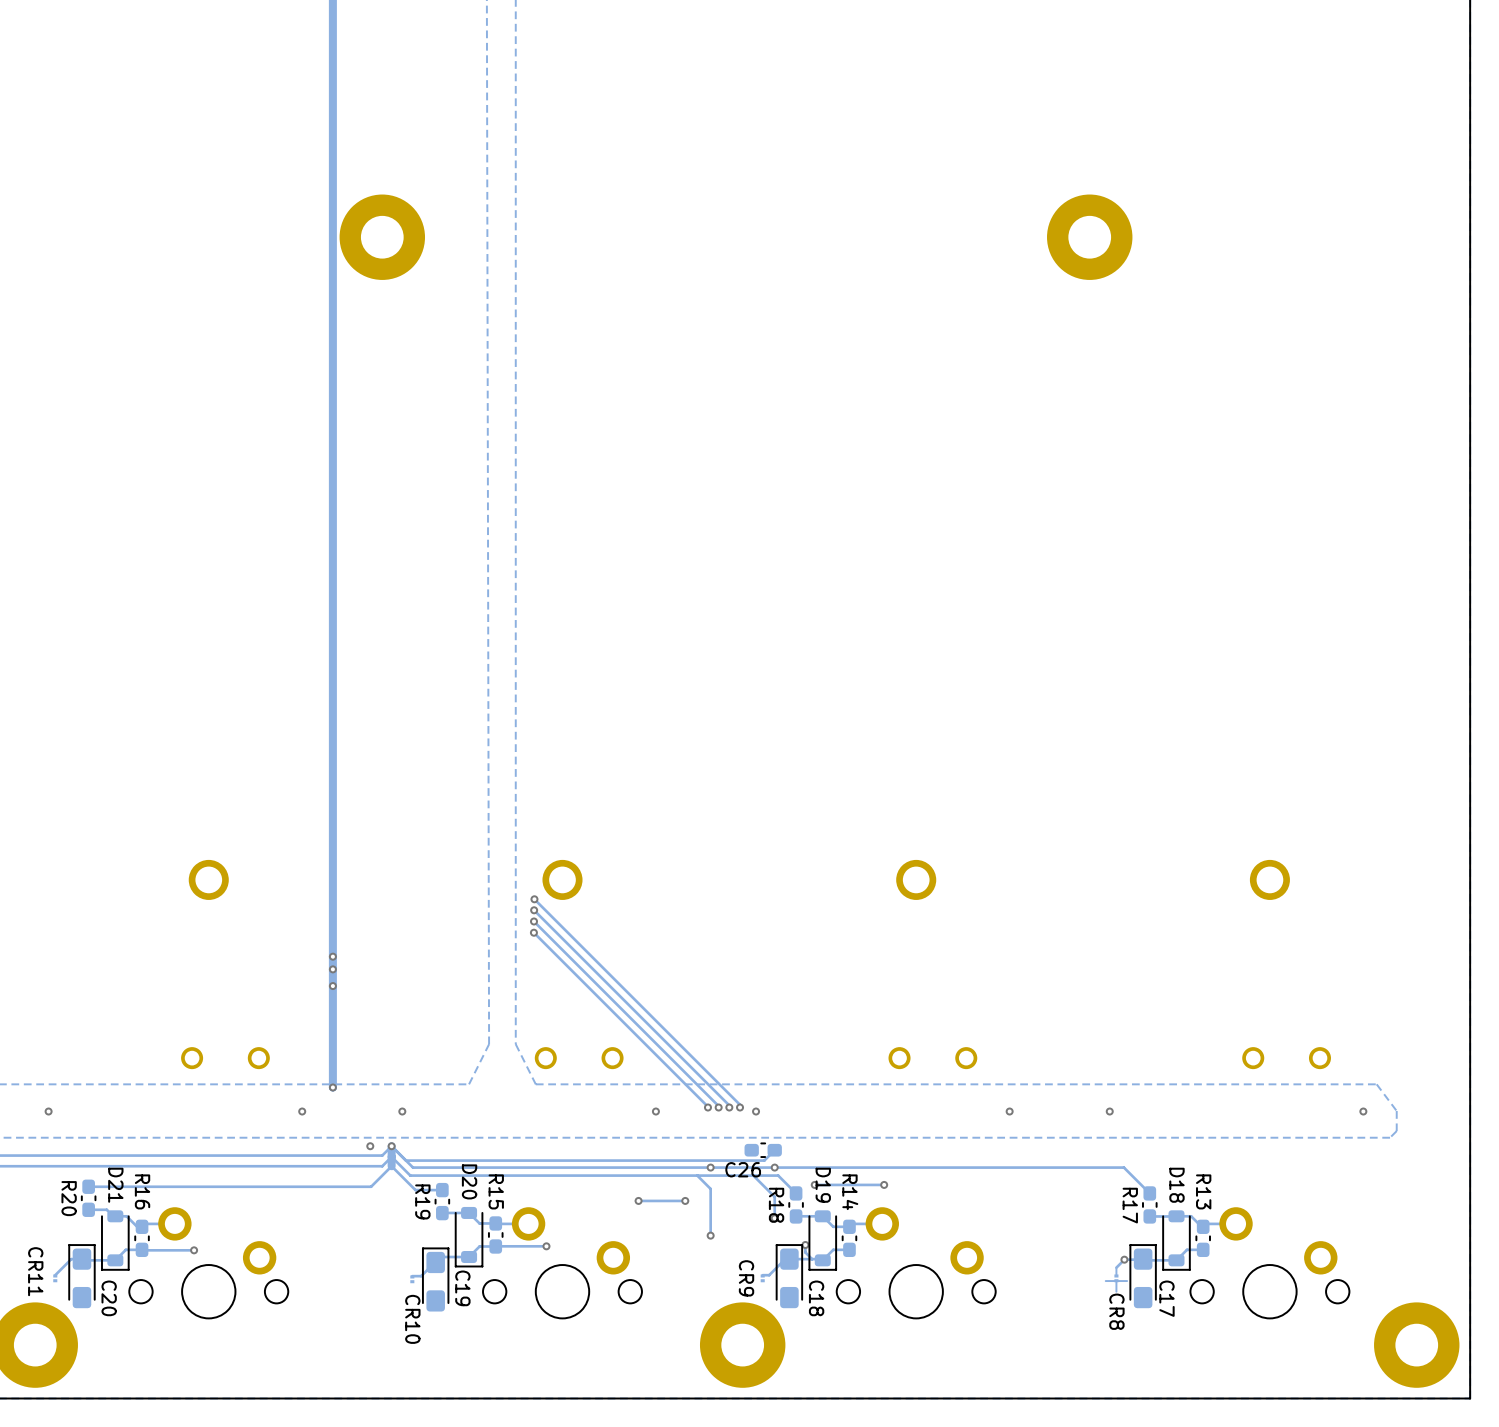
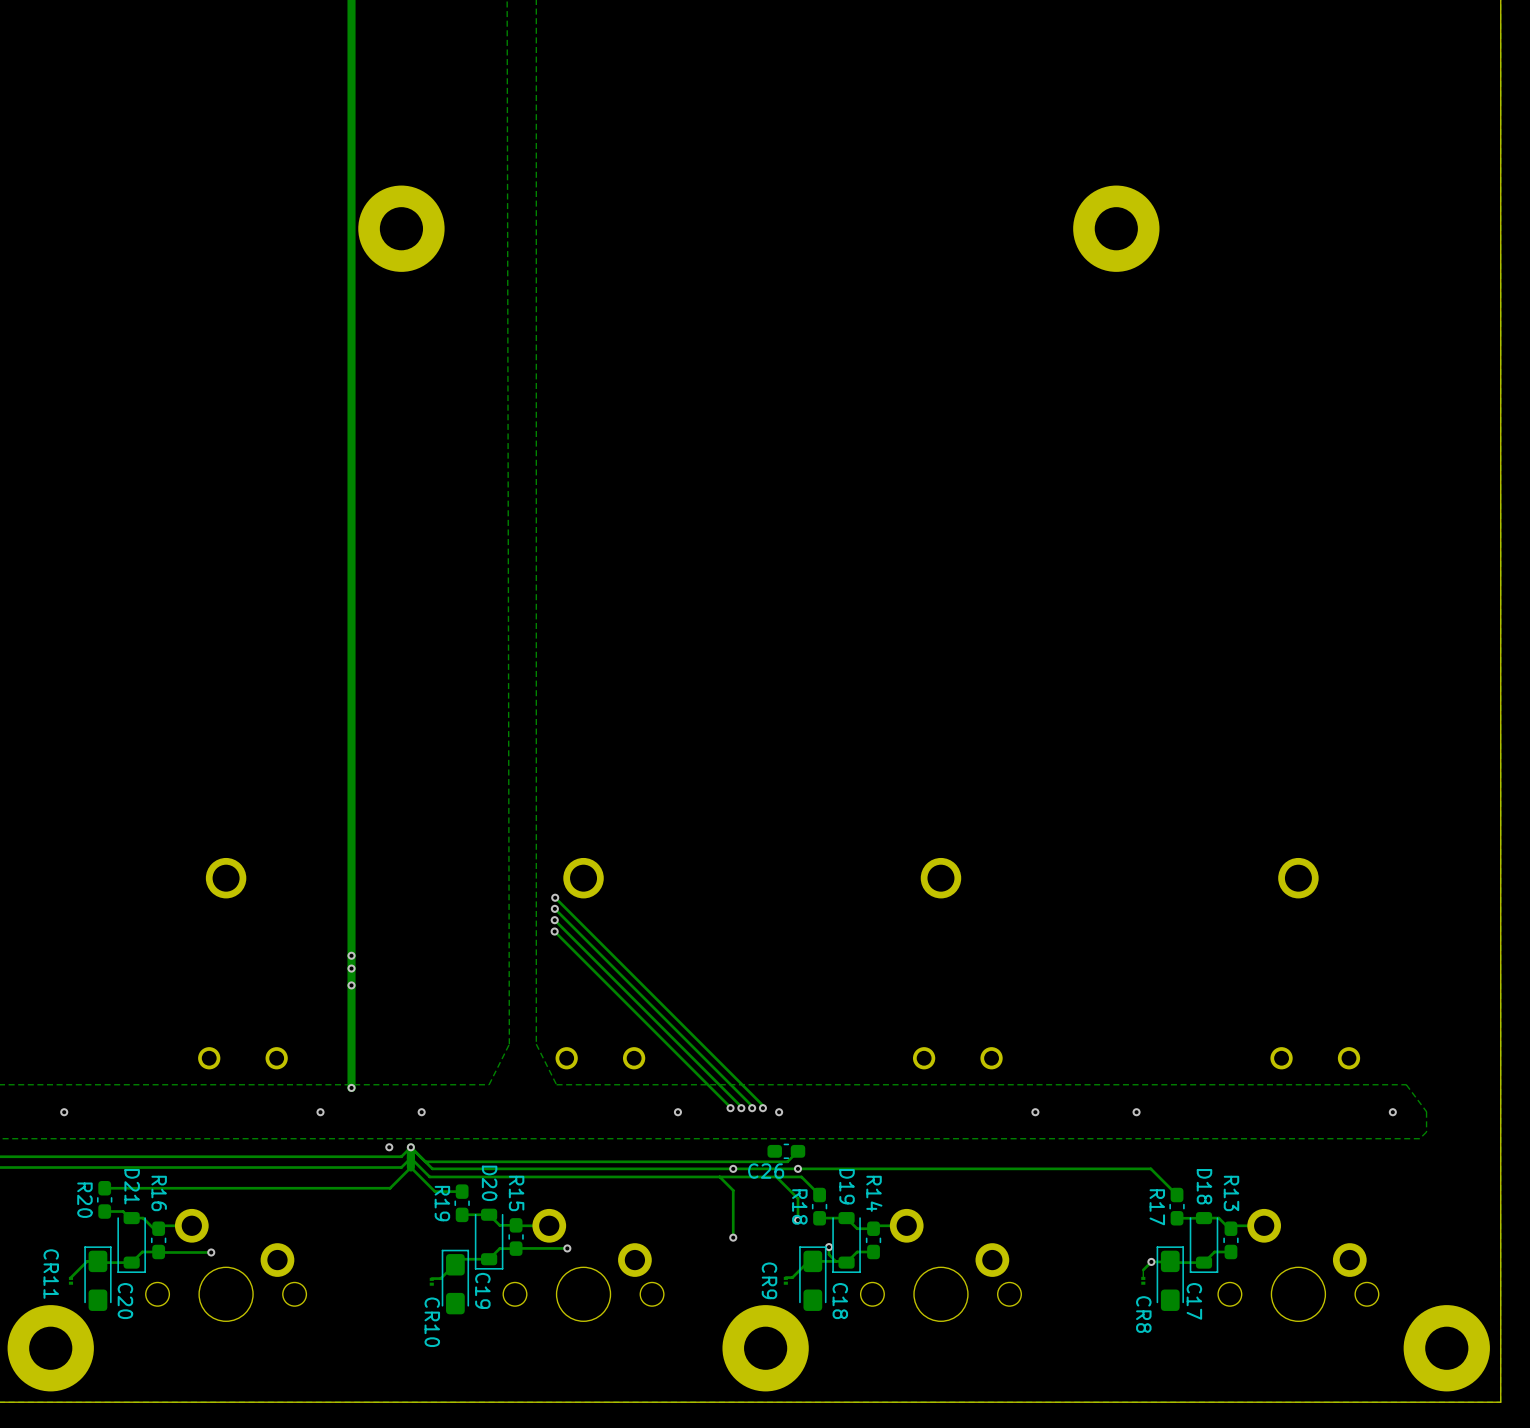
via: (814, 1184) -> none
track: (884, 1184) (814, 1184) -> none
via: (884, 1184) -> none
via: (638, 1200) -> none
track: (685, 1200) (638, 1200) -> none
via: (685, 1200) -> none
track: (1116, 1281) (1116, 1291) -> none
track: (1127, 1281) (1105, 1281) -> none

